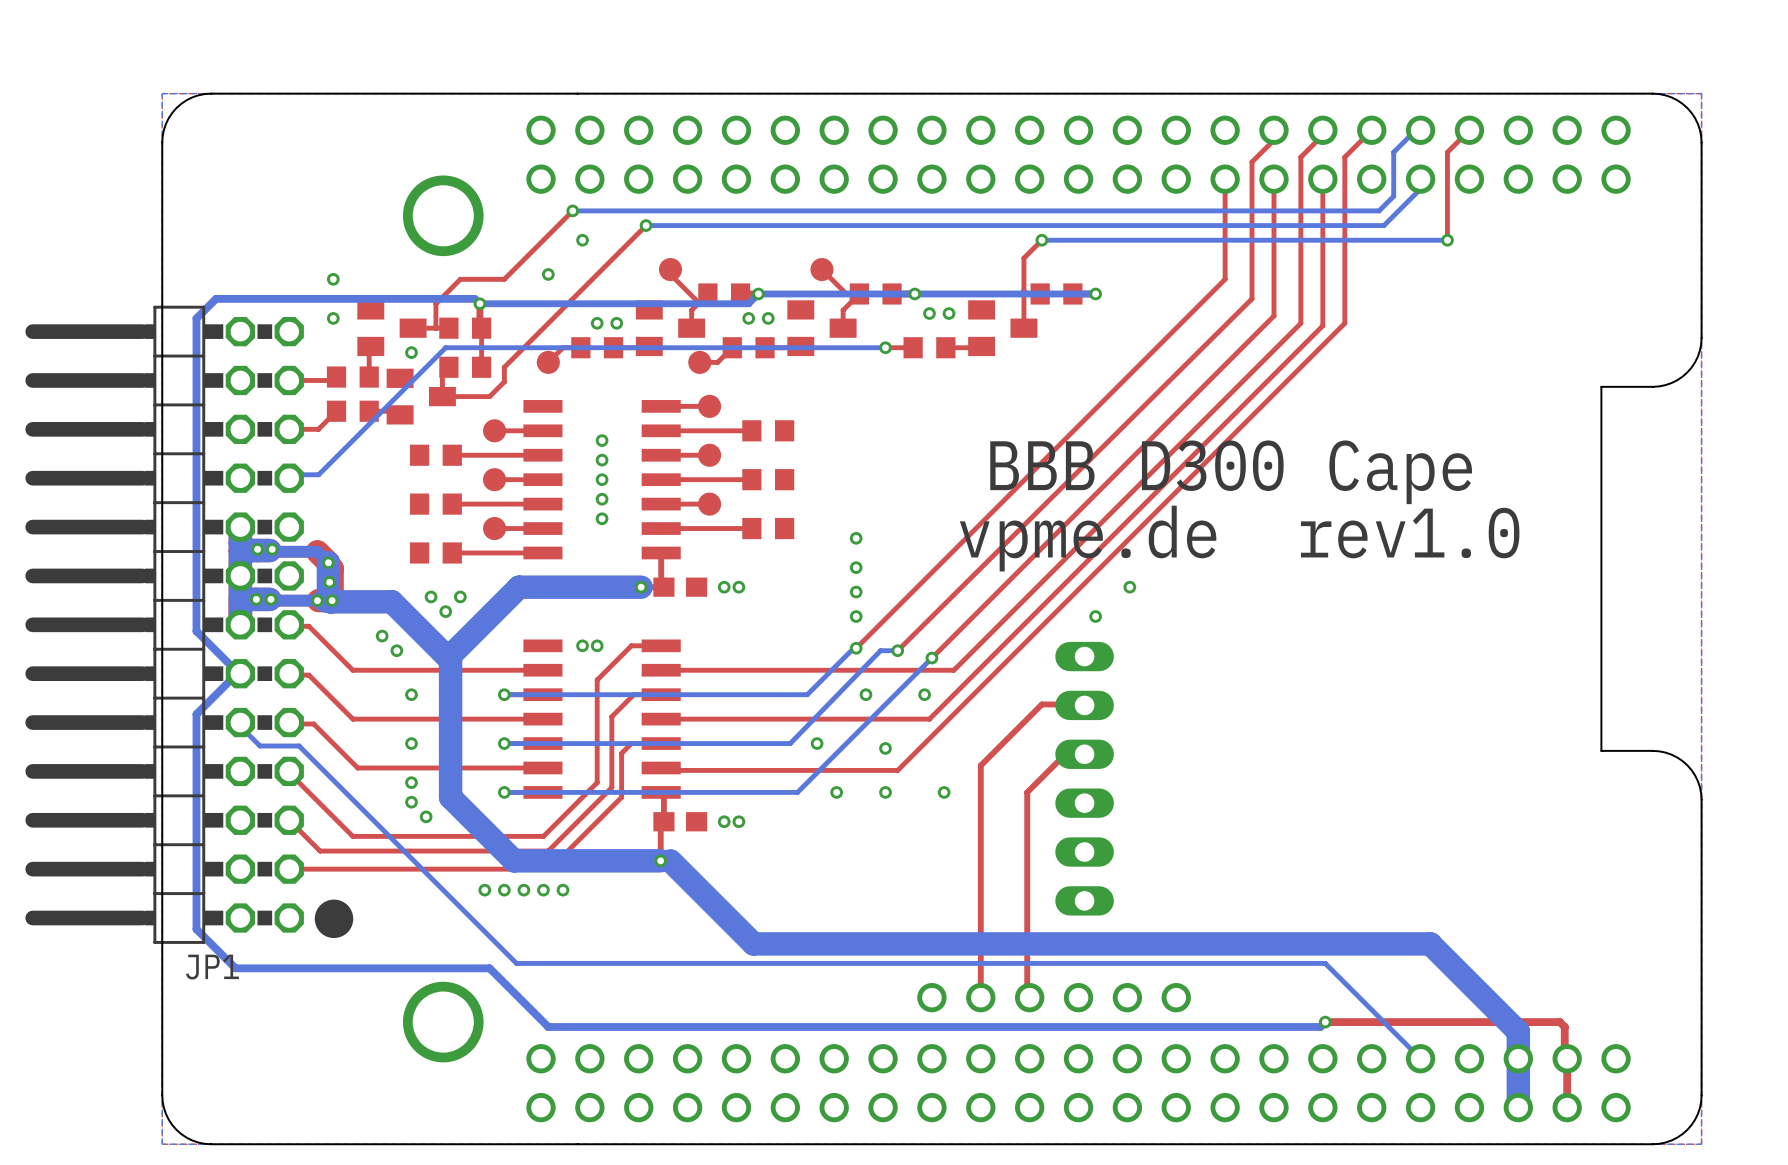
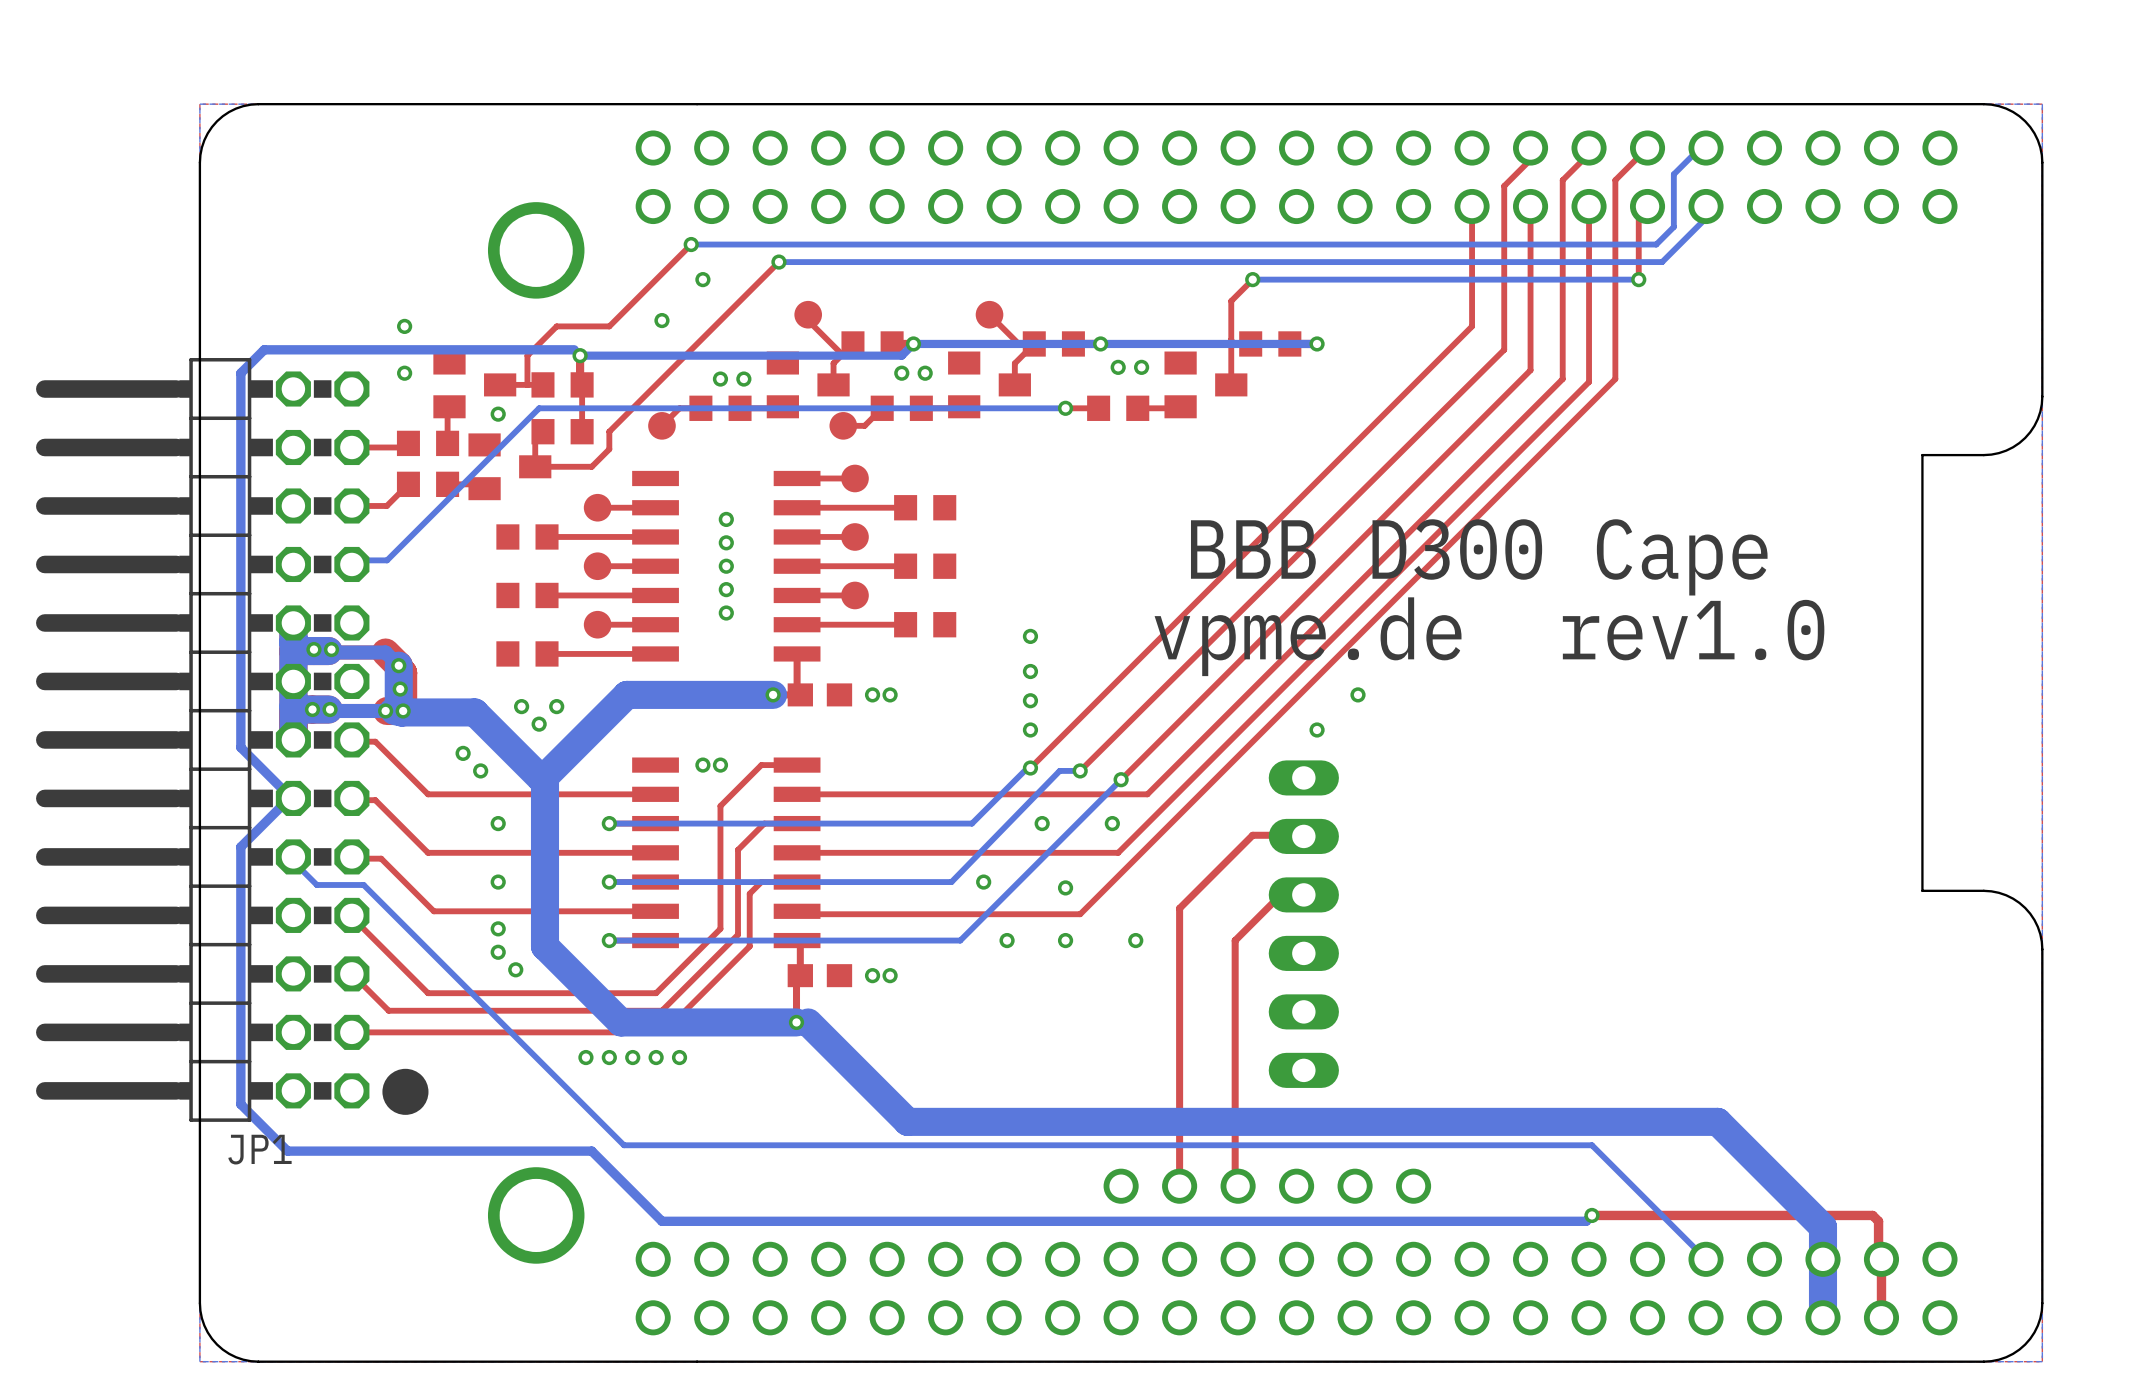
top track: (1469, 130) (1447, 152) (1447, 240) -> none
top track: none -> (1647, 206) (1638, 215) (1638, 279)
bottom track: (1447, 240) (1364, 240) -> none
via position: (1447, 240) -> (1638, 279)

